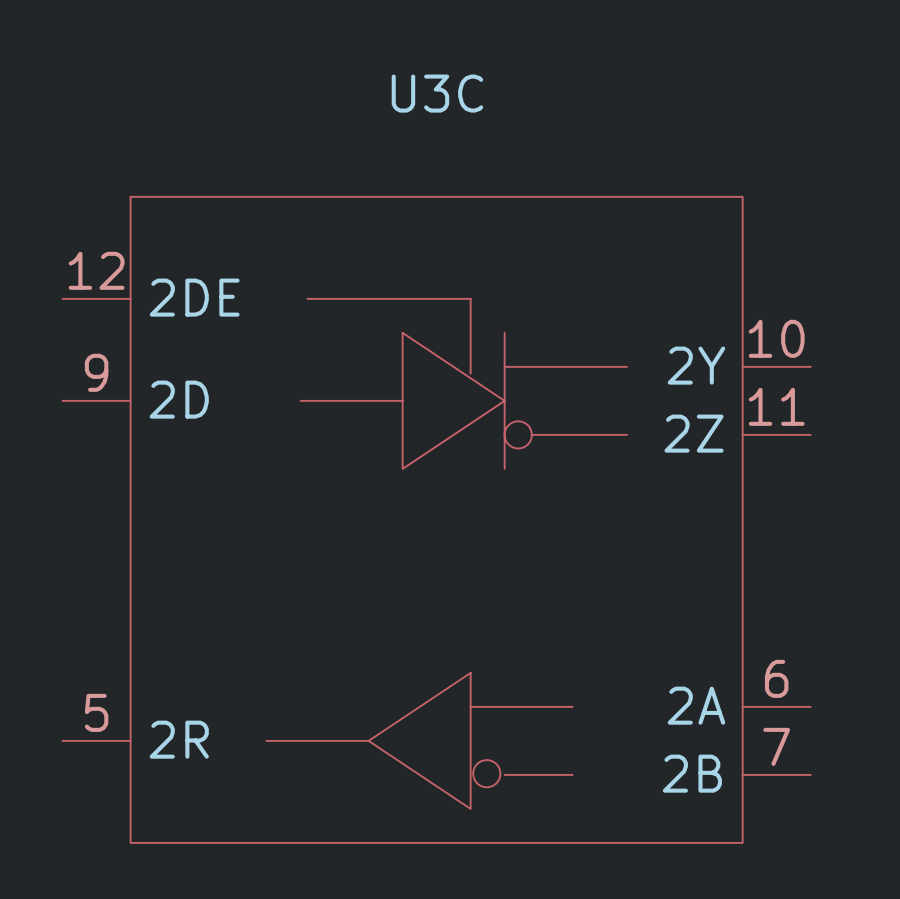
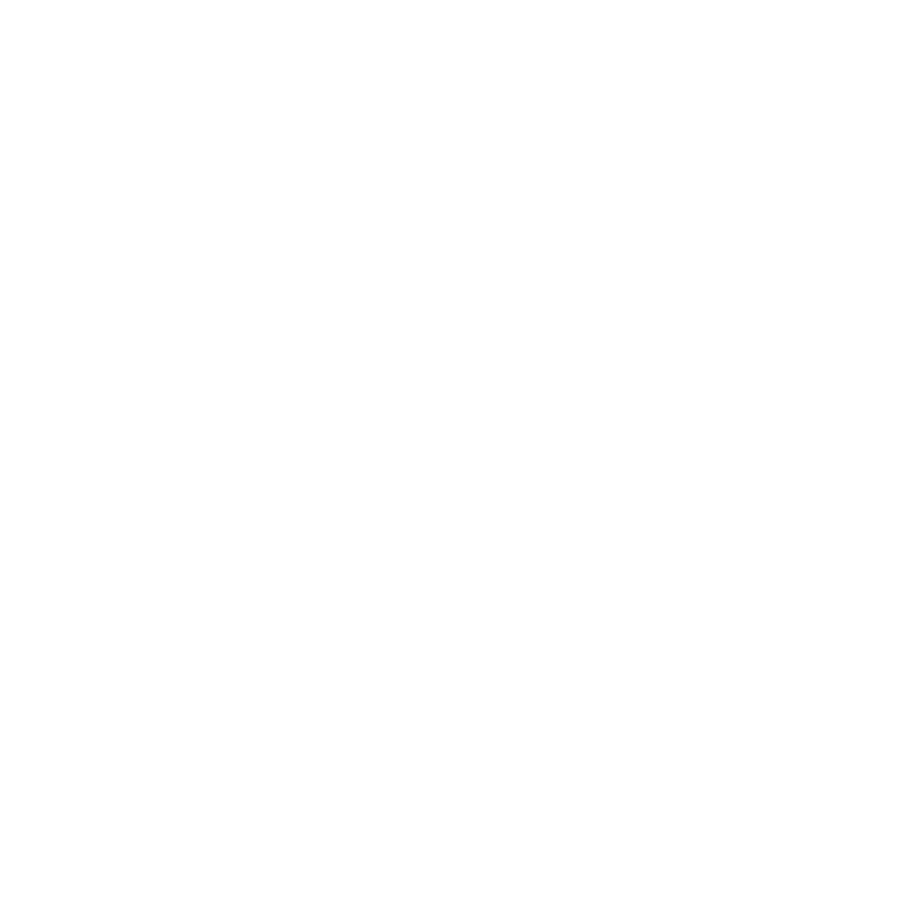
U3C: (436, 519) -> none

